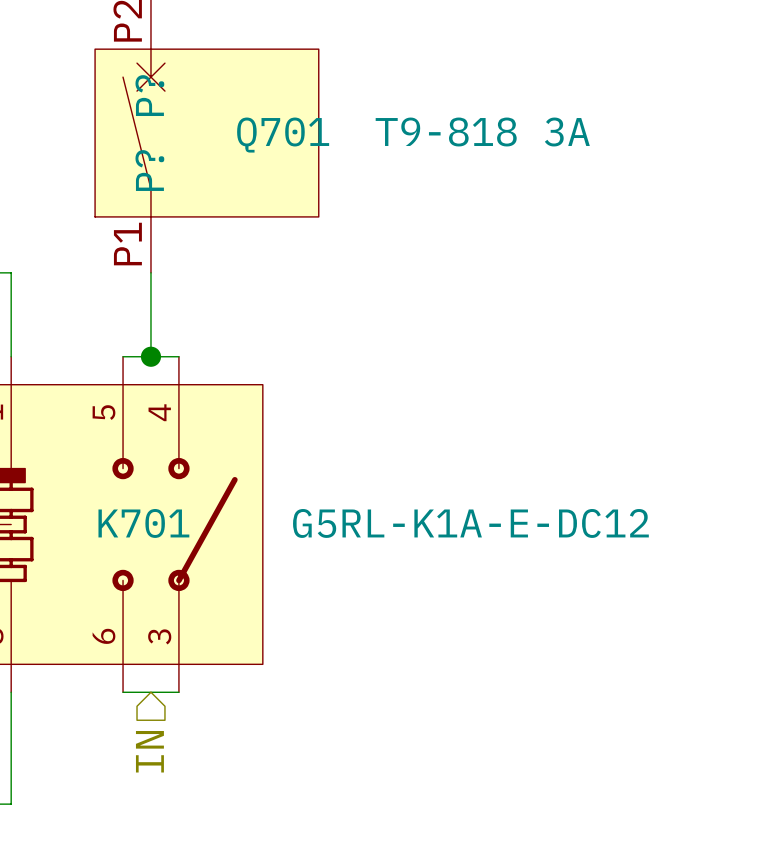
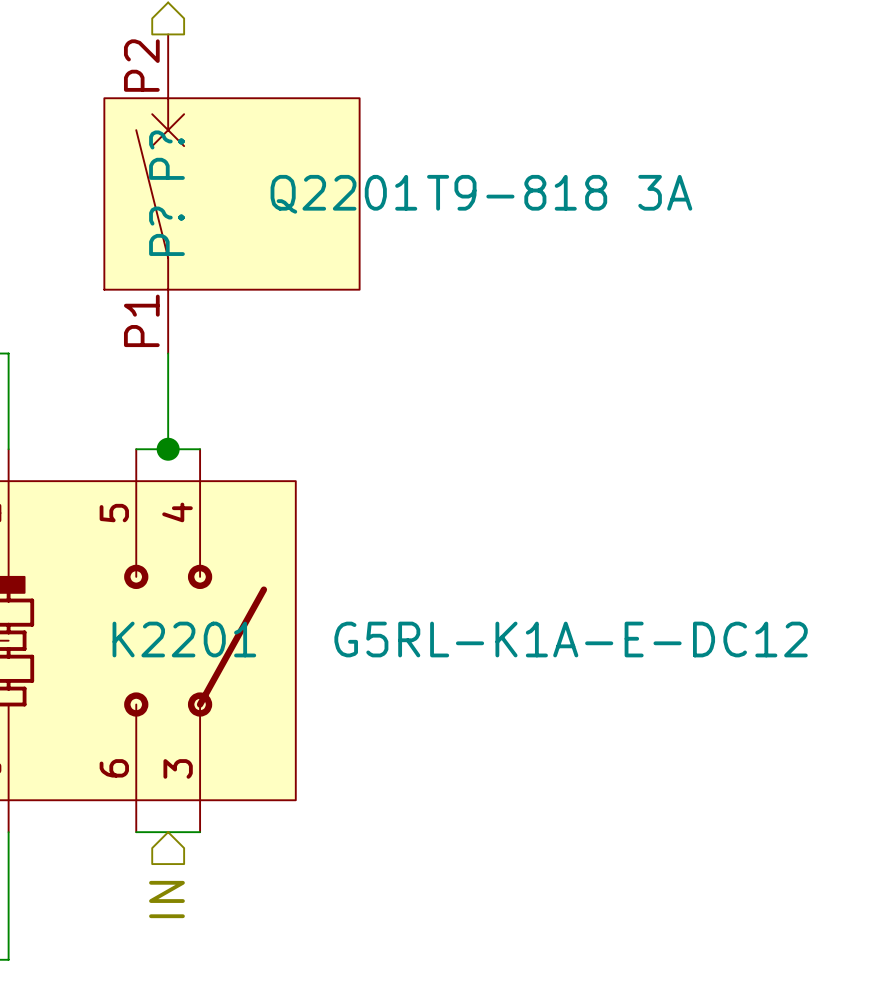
Q701 name: Q701 (283, 135) -> Q2201 (343, 194)
K701 name: K701 (143, 523) -> K2201 (184, 639)

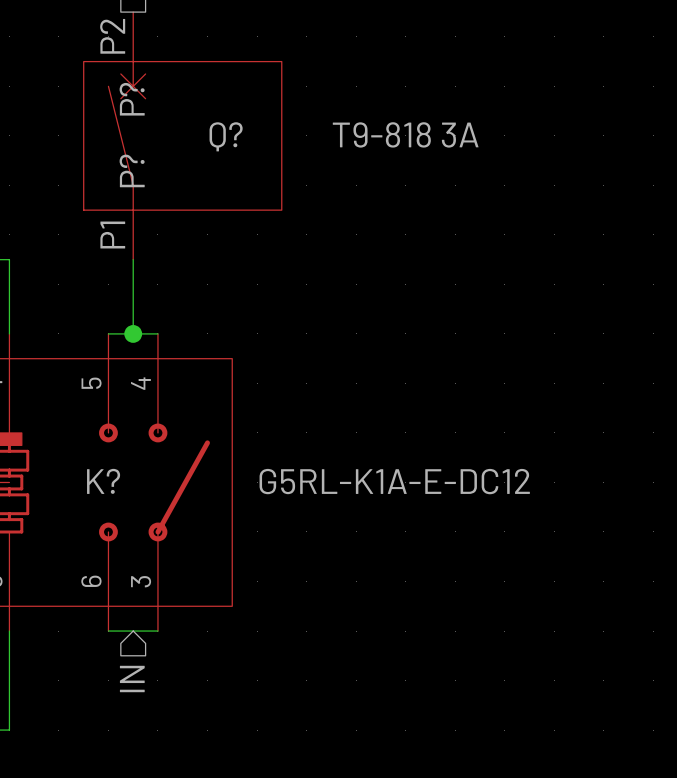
Q2201 name: Q2201 (343, 194) -> Q? (226, 136)
K2201 name: K2201 (184, 639) -> K? (103, 481)

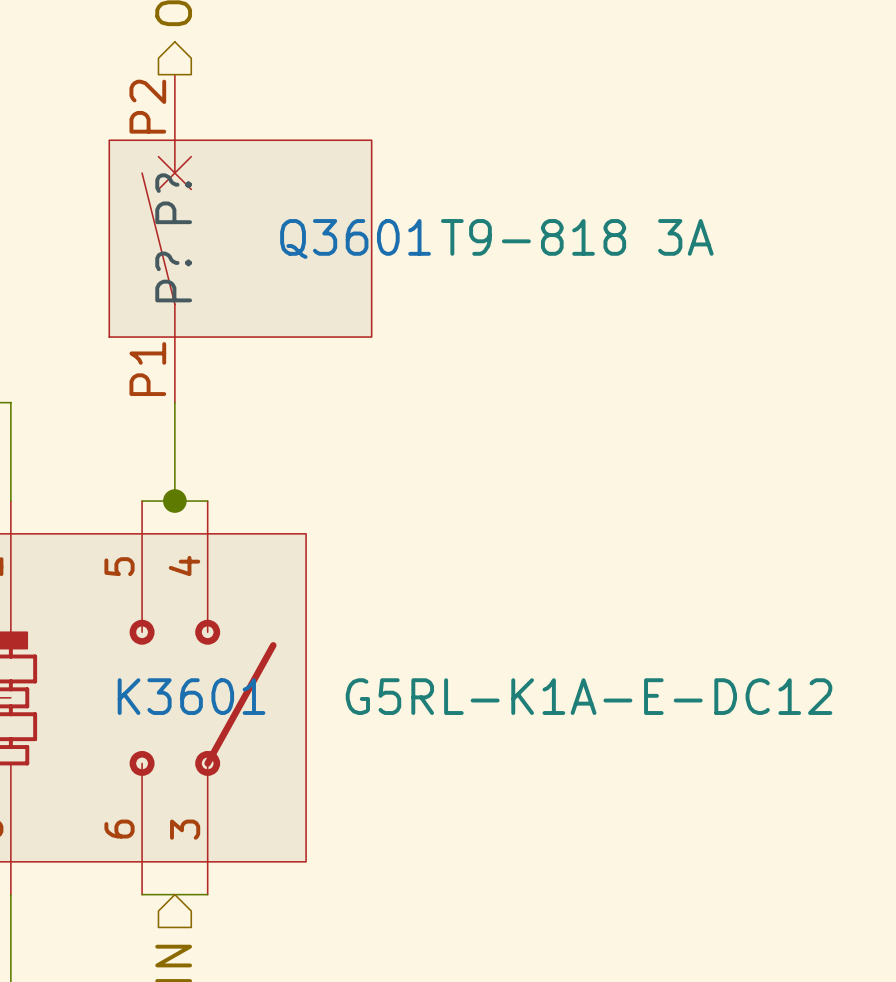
Q? name: Q? (226, 136) -> Q3601 (355, 238)
K? name: K? (103, 481) -> K3601 (191, 696)

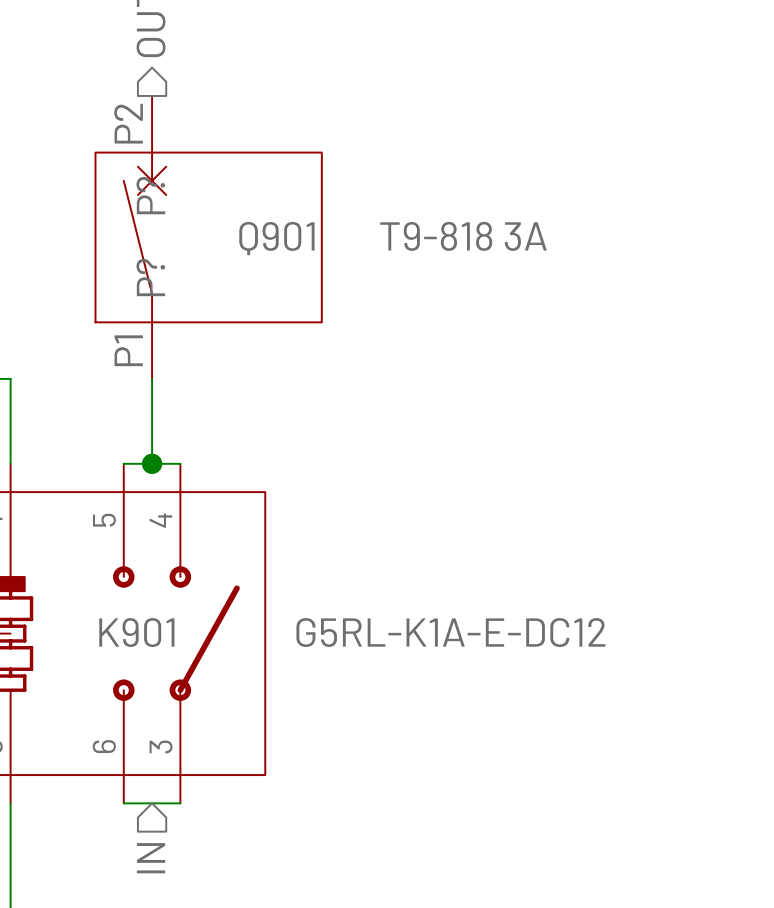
Q3601 name: Q3601 (355, 238) -> Q901 (276, 238)
K3601 name: K3601 (191, 696) -> K901 (136, 632)

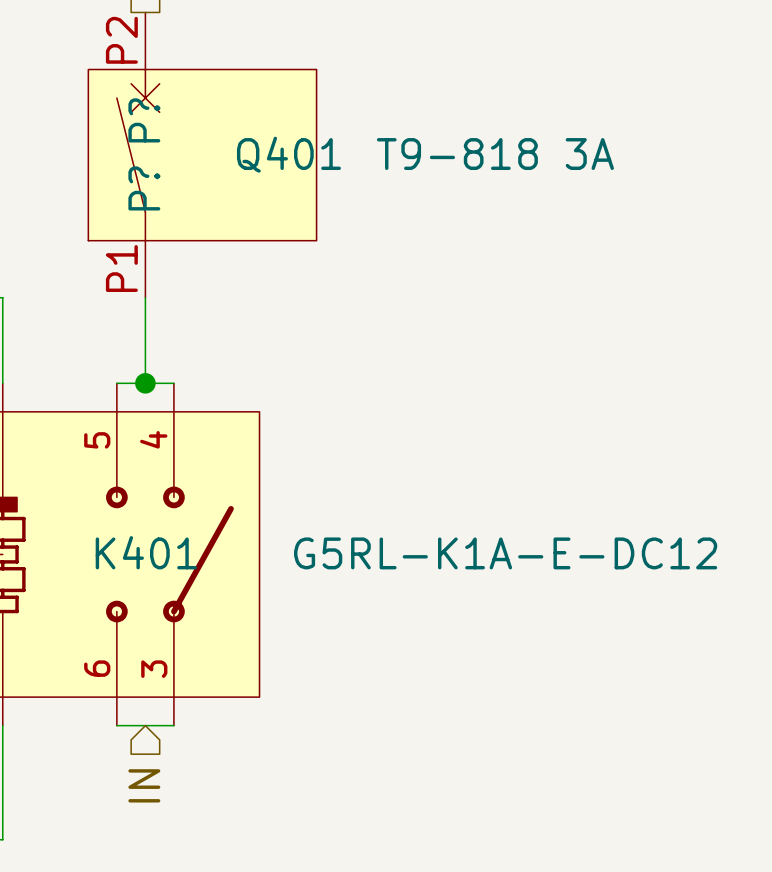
Q901 name: Q901 (276, 238) -> Q401 (288, 154)
K901 name: K901 (136, 632) -> K401 (146, 552)

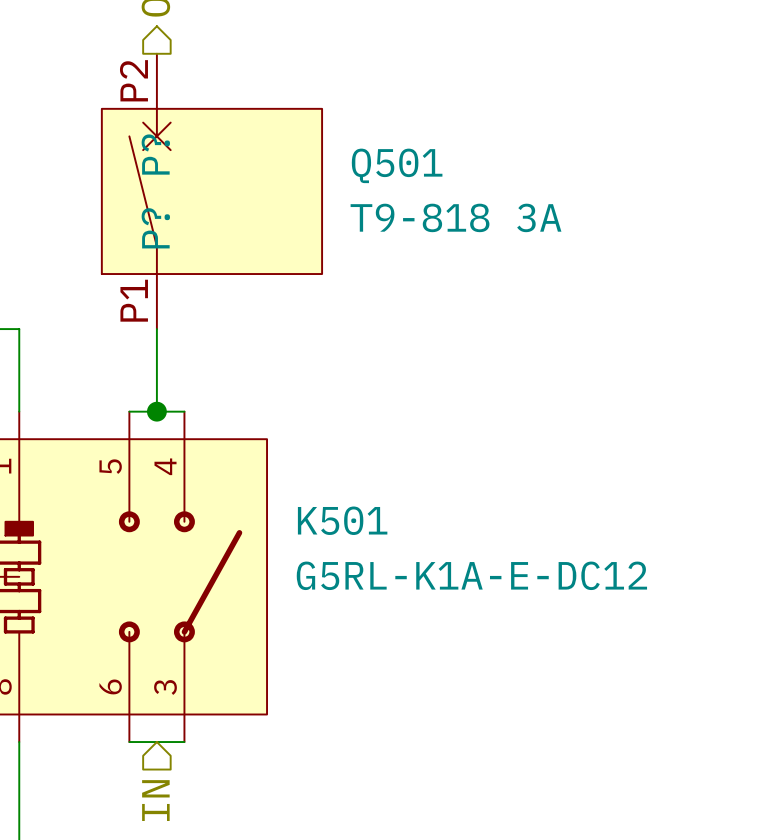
Q401 name: Q401 (288, 154) -> Q501 (397, 165)
Q401 value position: T9-818 3A (495, 154) -> T9-818 3A (456, 217)
K401 name: K401 (146, 552) -> K501 (342, 520)

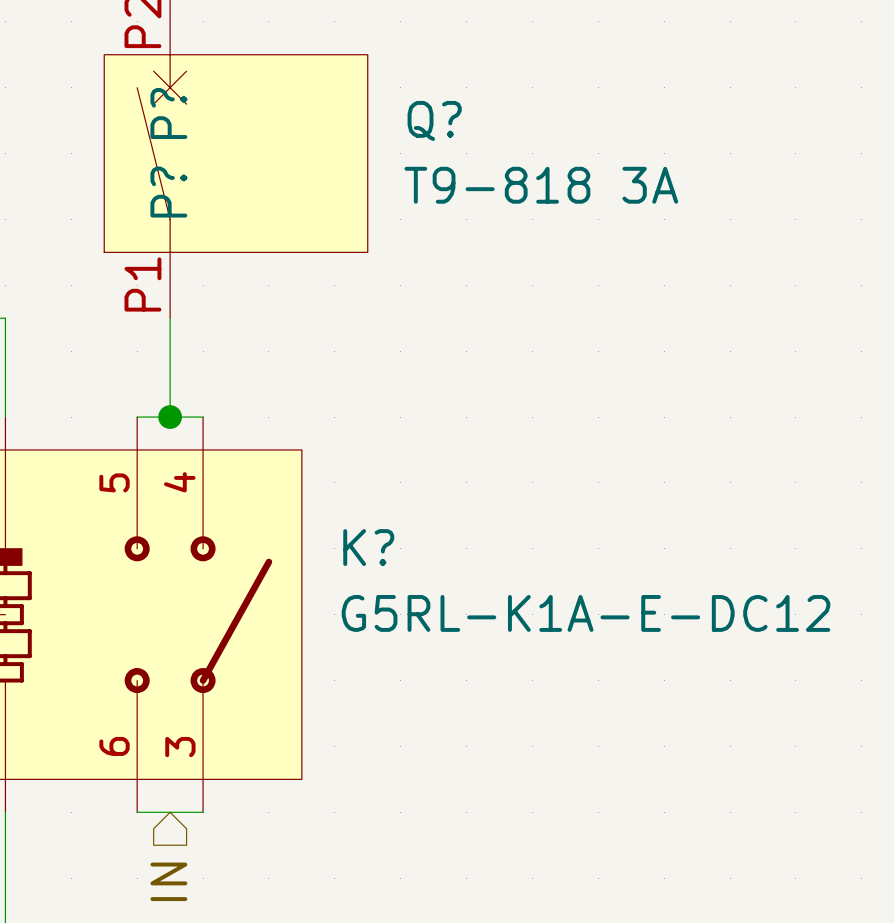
Q501 name: Q501 (397, 165) -> Q? (434, 120)
K501 name: K501 (342, 520) -> K? (368, 547)

